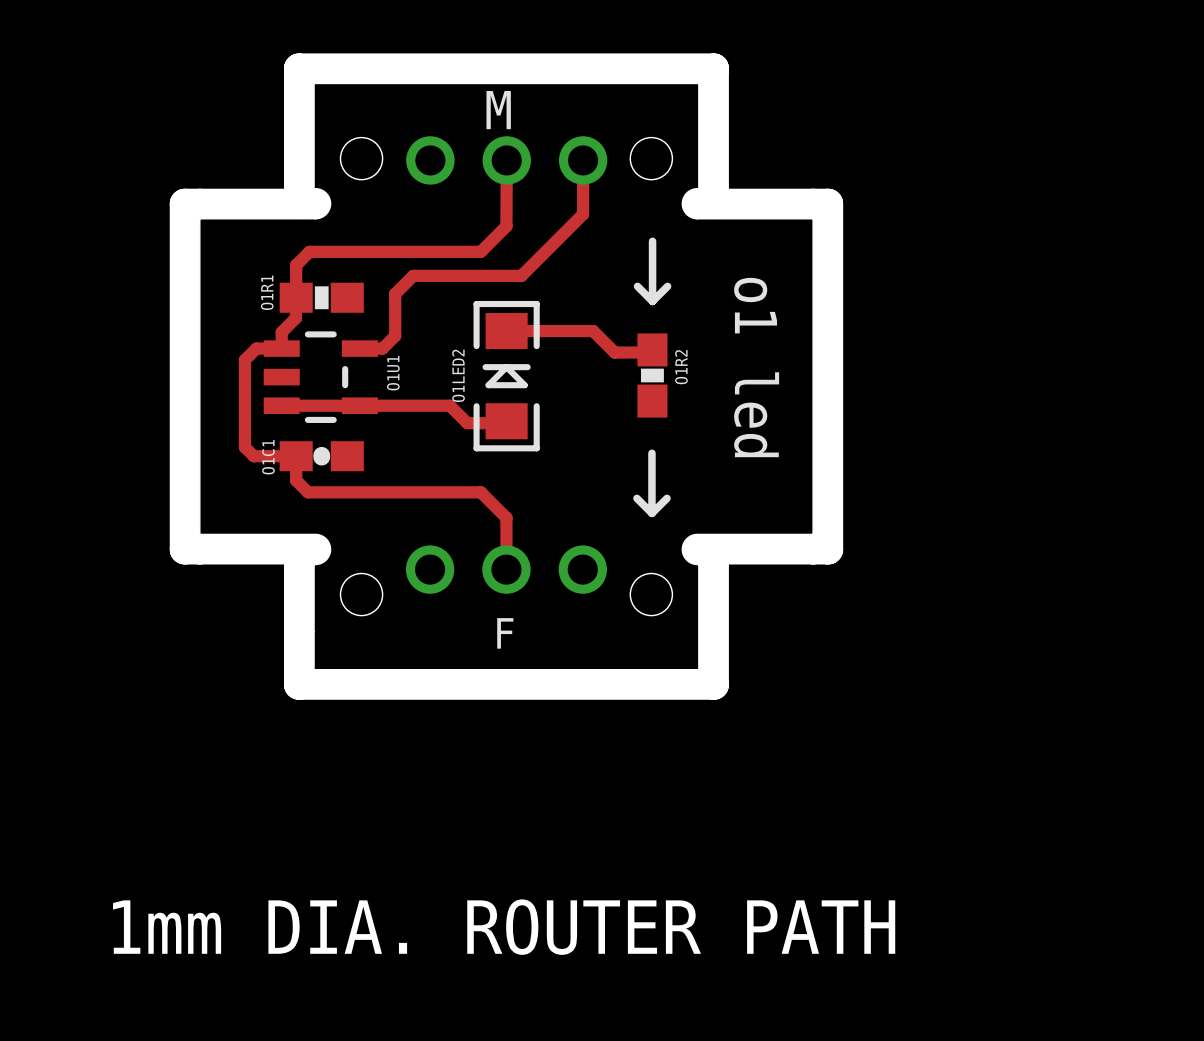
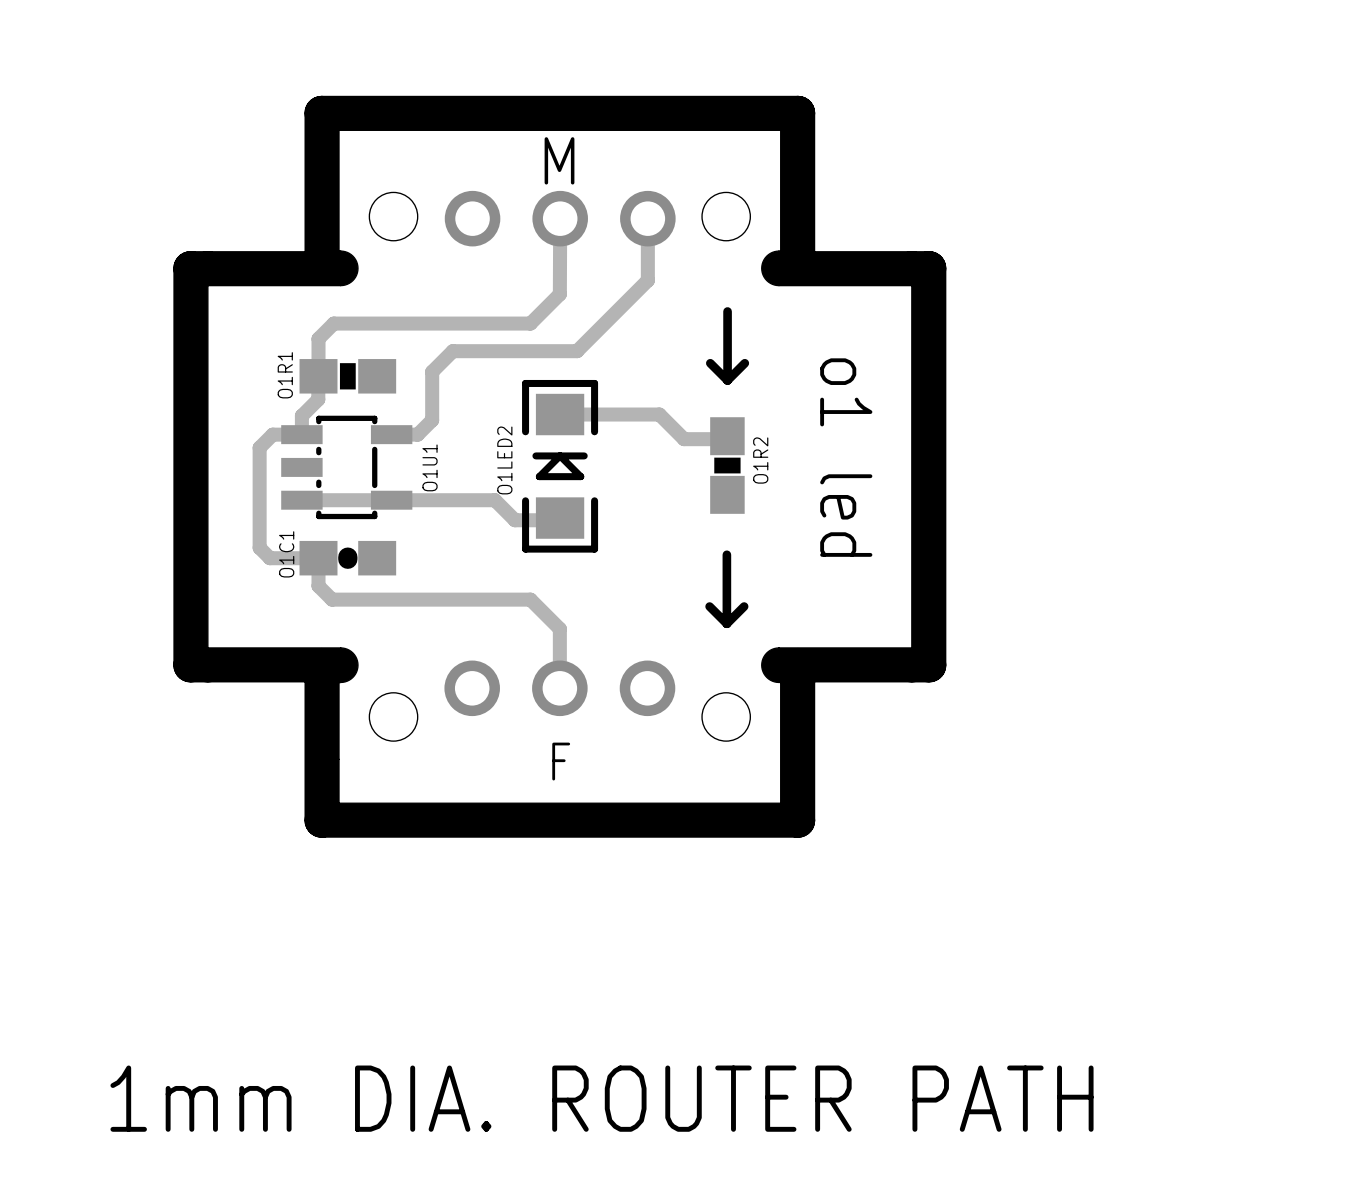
O1U1 footprint: [263, 331, 378, 423] -> [281, 415, 413, 520]

